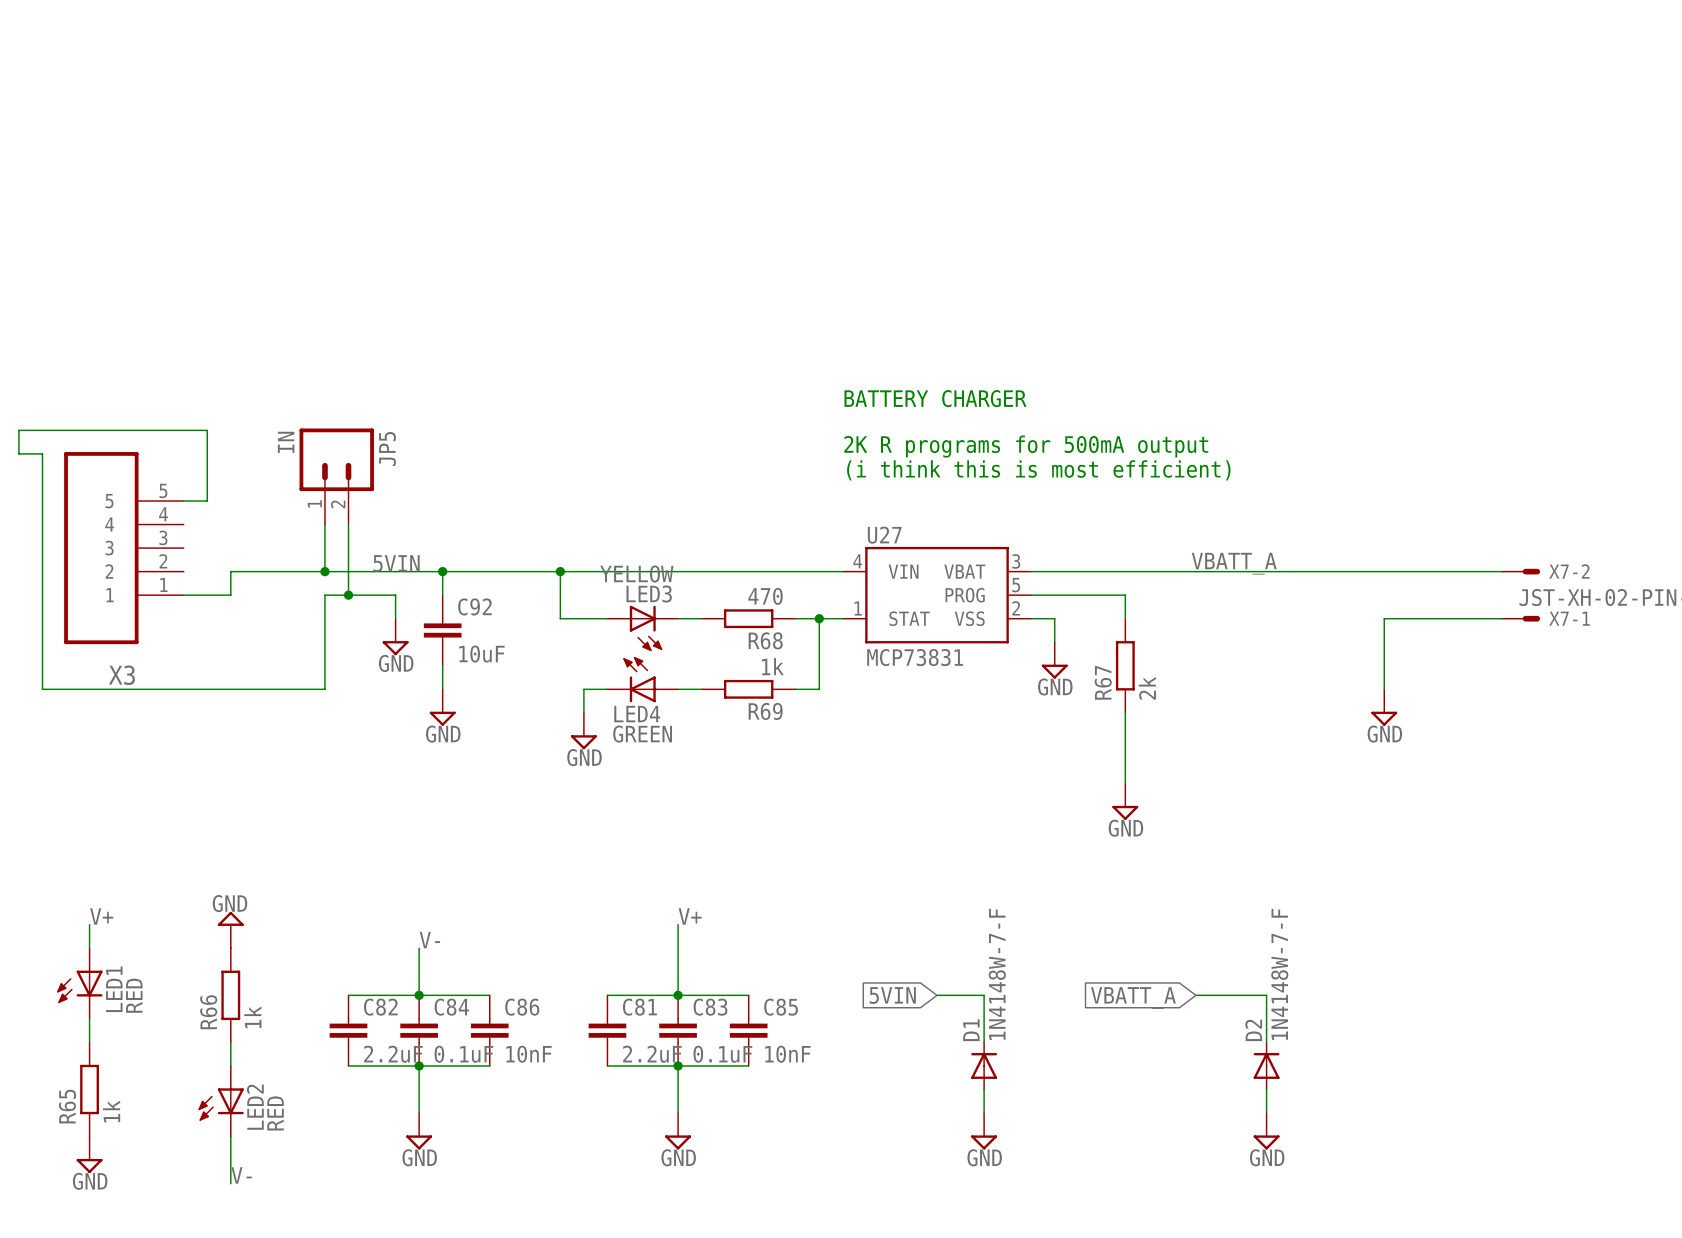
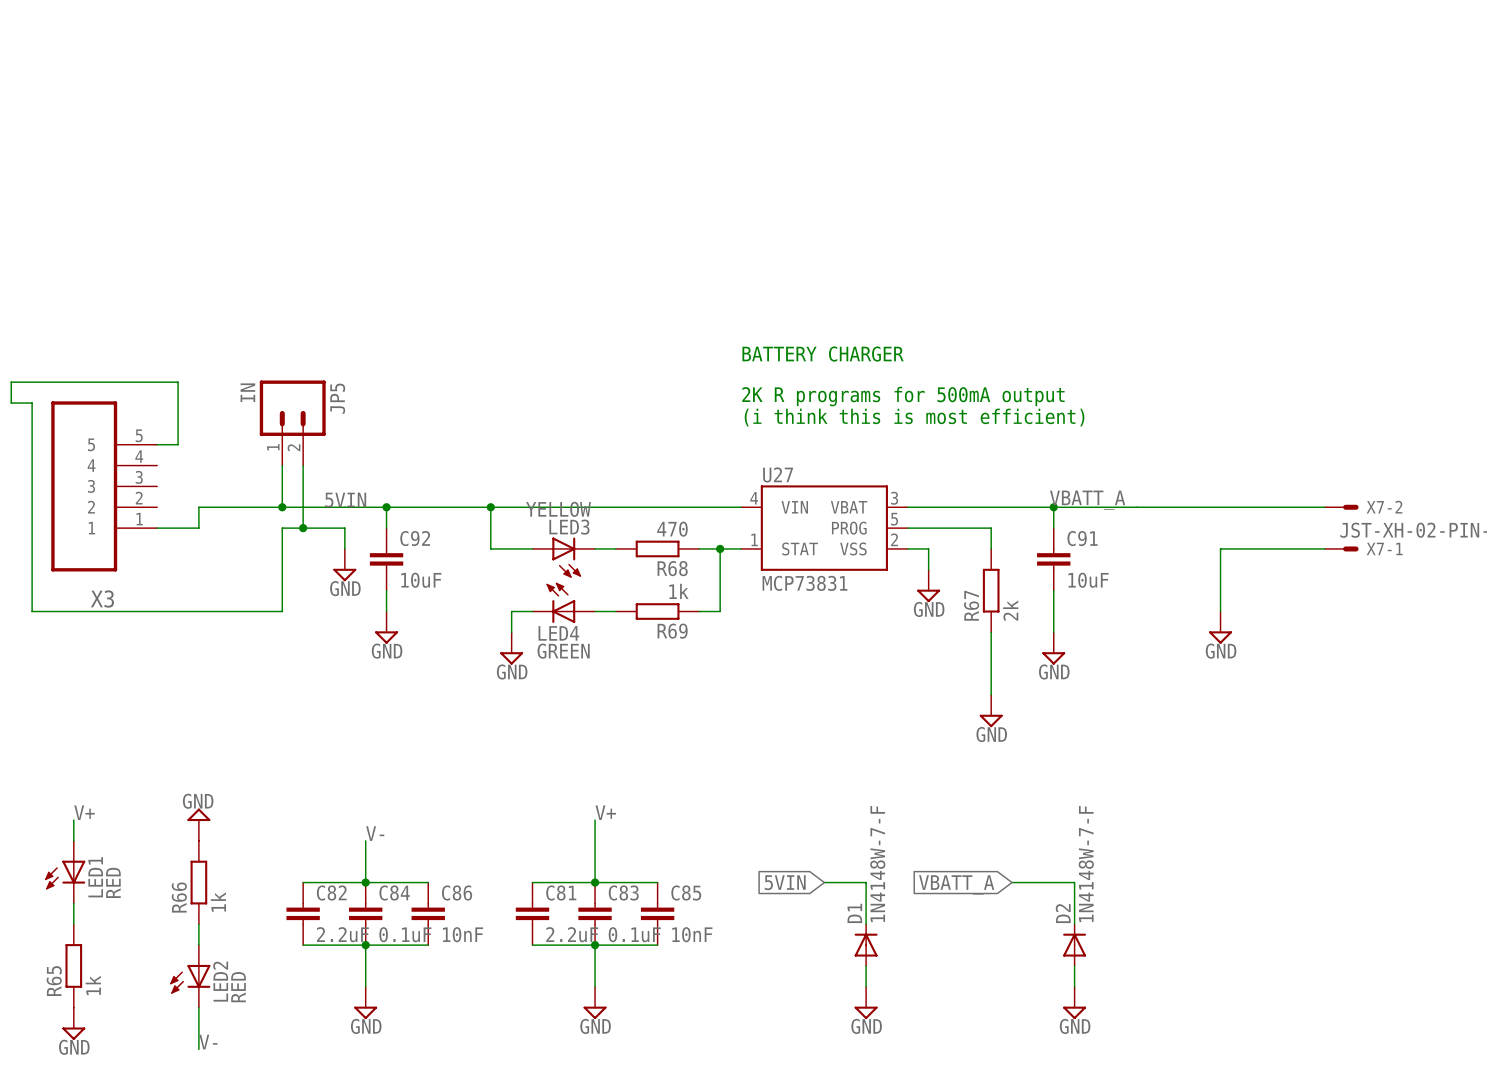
wire: none -> (1053, 507) (1053, 528)
junction: none -> (1053, 507)
C91: none -> 10uF (1053, 559)
wire: none -> (1053, 590) (1053, 632)
power symbol: none -> GND (1053, 648)
wire: none -> (1012, 882) (1053, 882)
wire: (1219, 995) (1266, 995) (1266, 1042) -> (1074, 882) (1074, 924)
global label position: VBATT_A (1133, 998) -> VBATT_A (956, 884)
D2 position: (1266, 1065) -> (1074, 945)
wire: (1266, 1089) (1266, 1113) -> (1074, 965) (1074, 986)
power symbol position: GND (1266, 1131) -> GND (1074, 1002)

